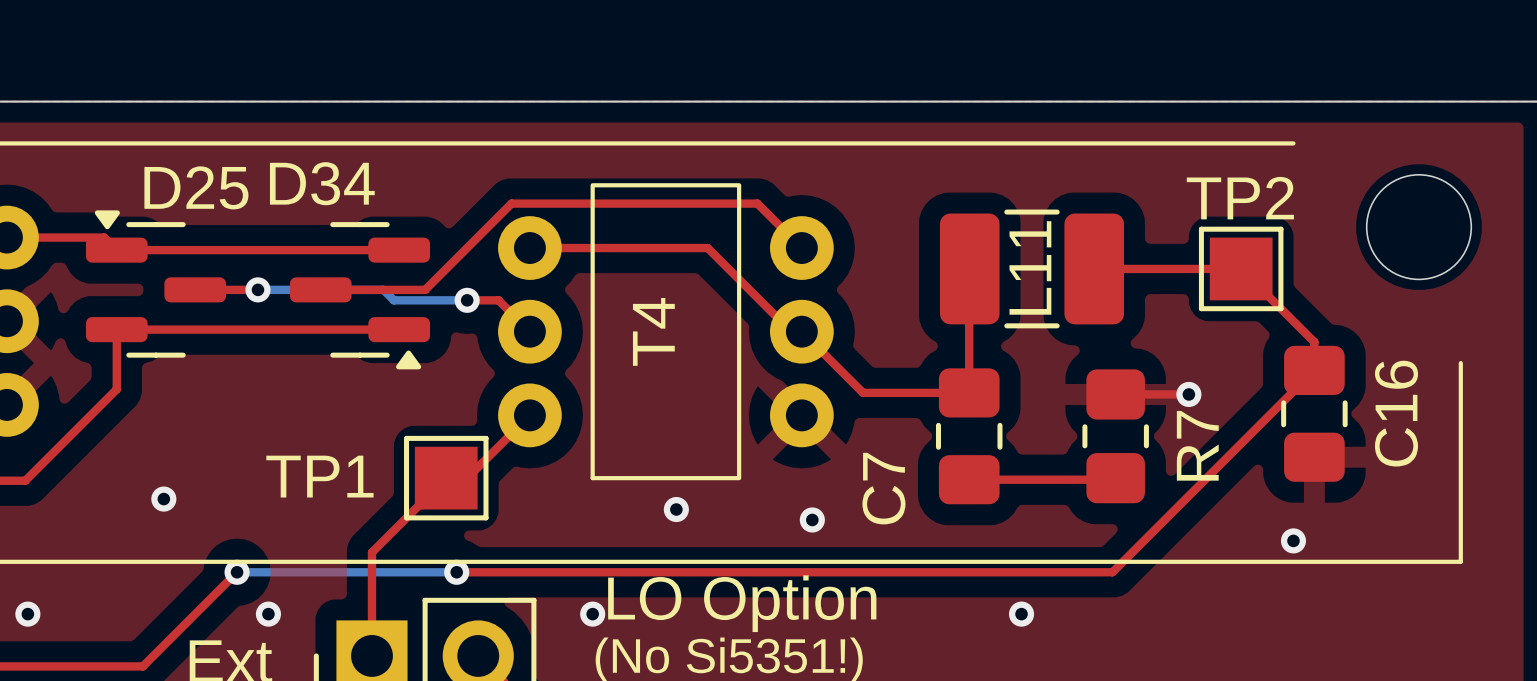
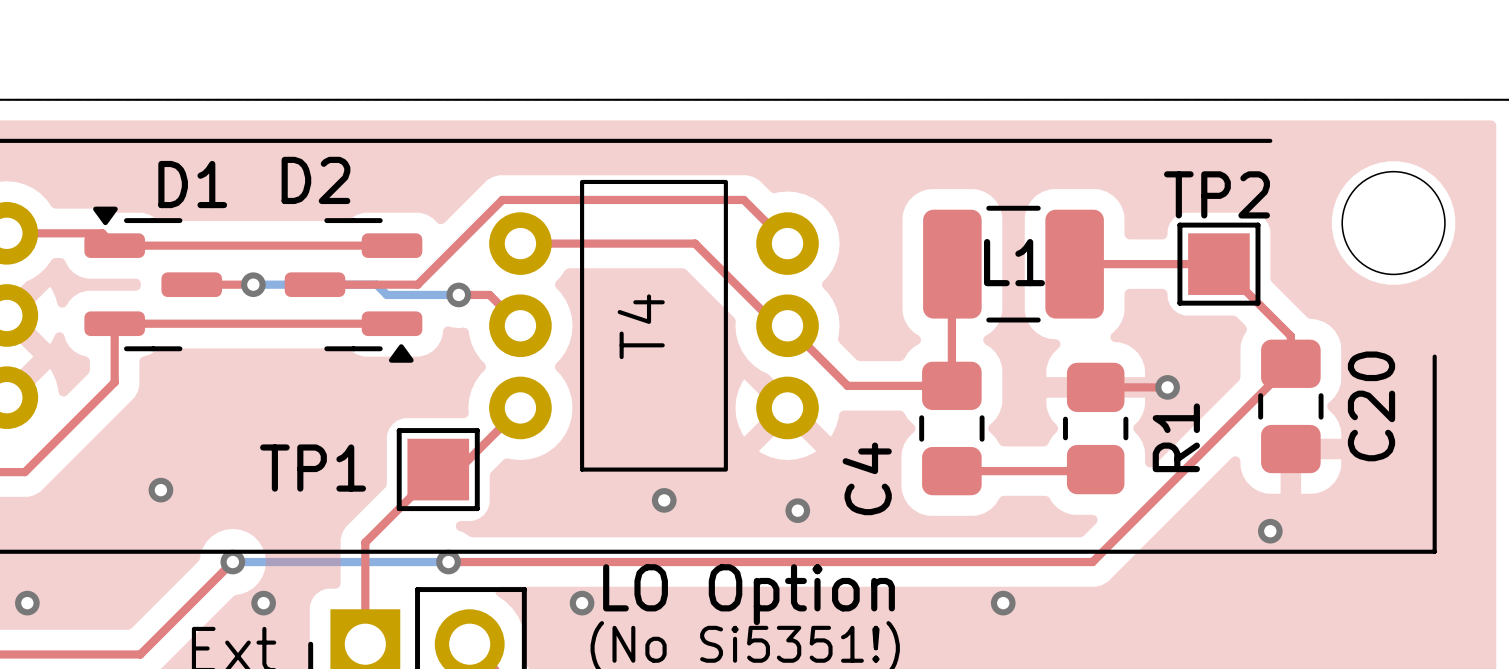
D34 name: D34 (322, 183) -> D2 (315, 180)
D25 name: D25 (196, 187) -> D1 (192, 184)
L11 name: L11 (1030, 267) -> L1 (1014, 262)
C16 name: C16 (1396, 413) -> C20 (1371, 406)
R7 name: R7 (1197, 445) -> R1 (1176, 437)
C7 name: C7 (883, 488) -> C4 (867, 478)

